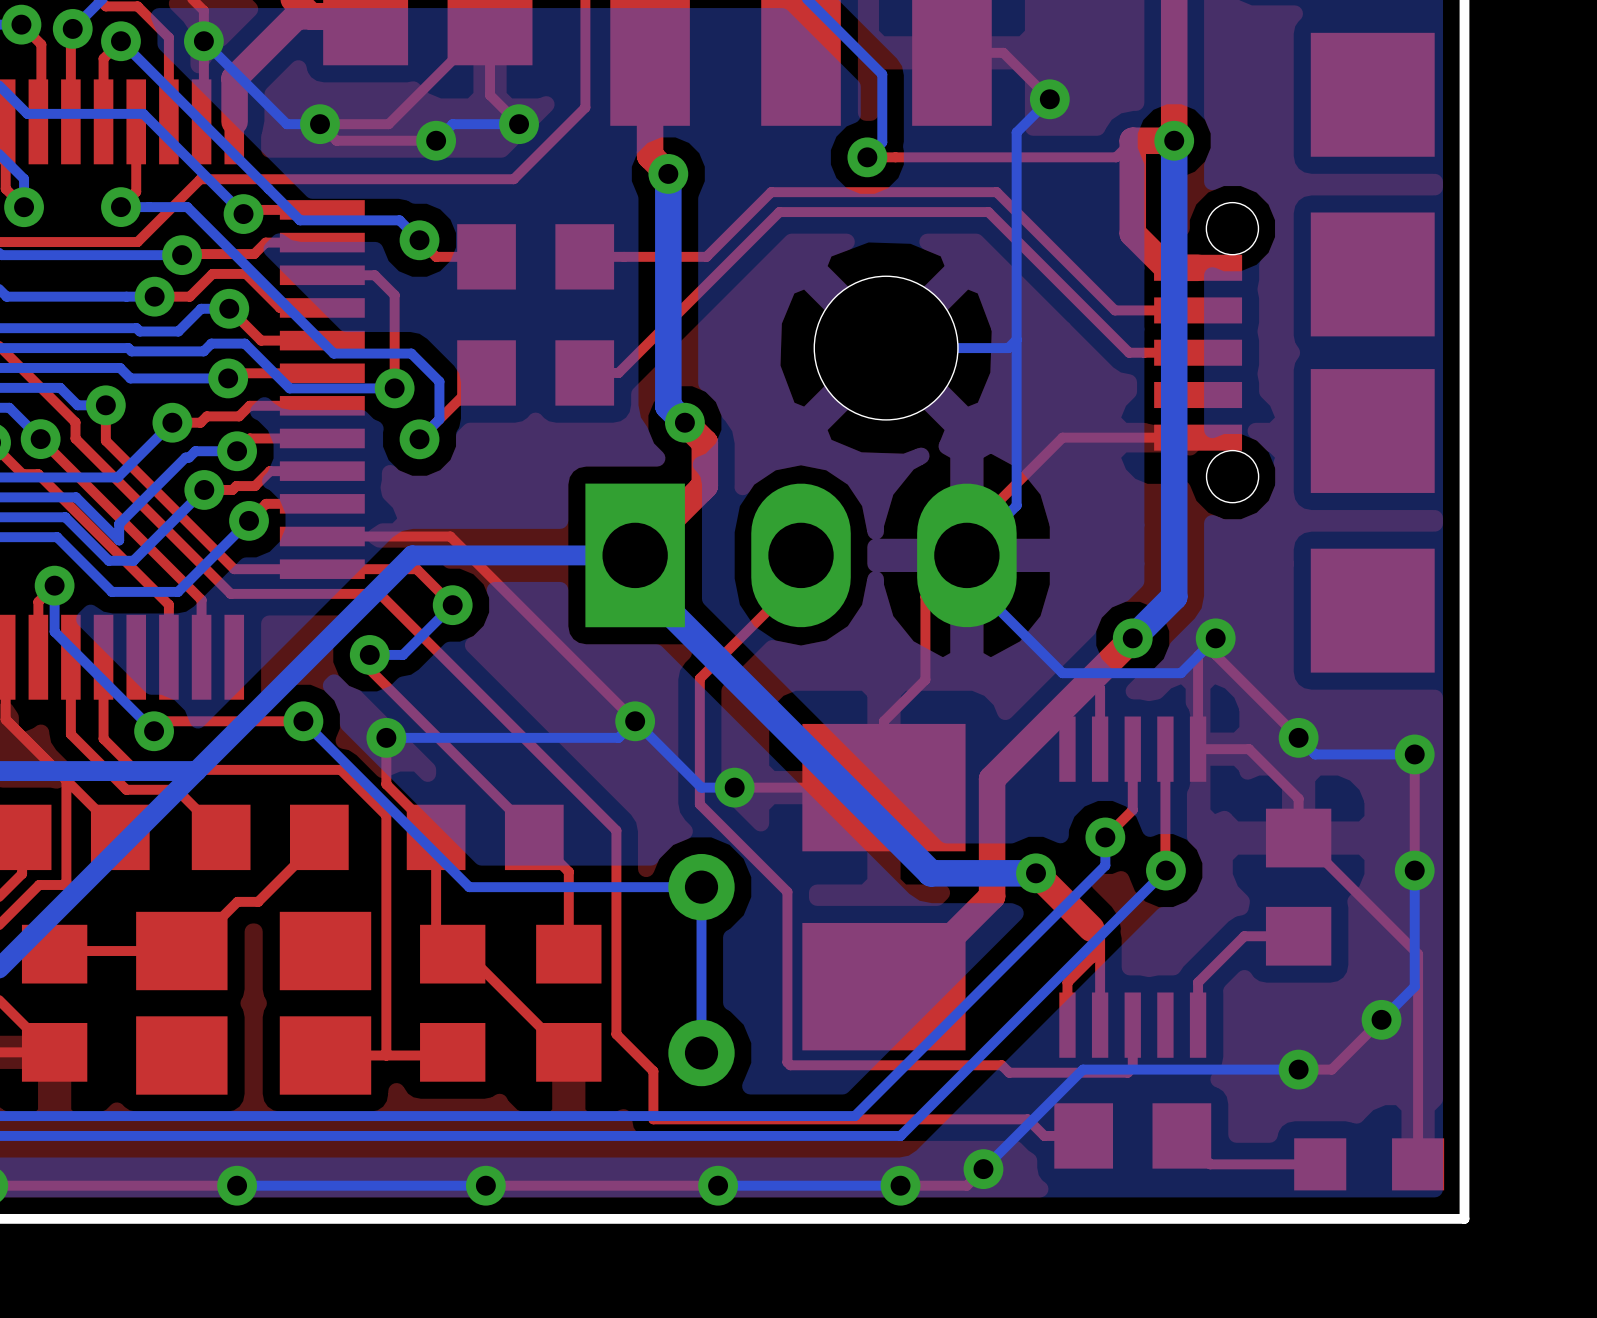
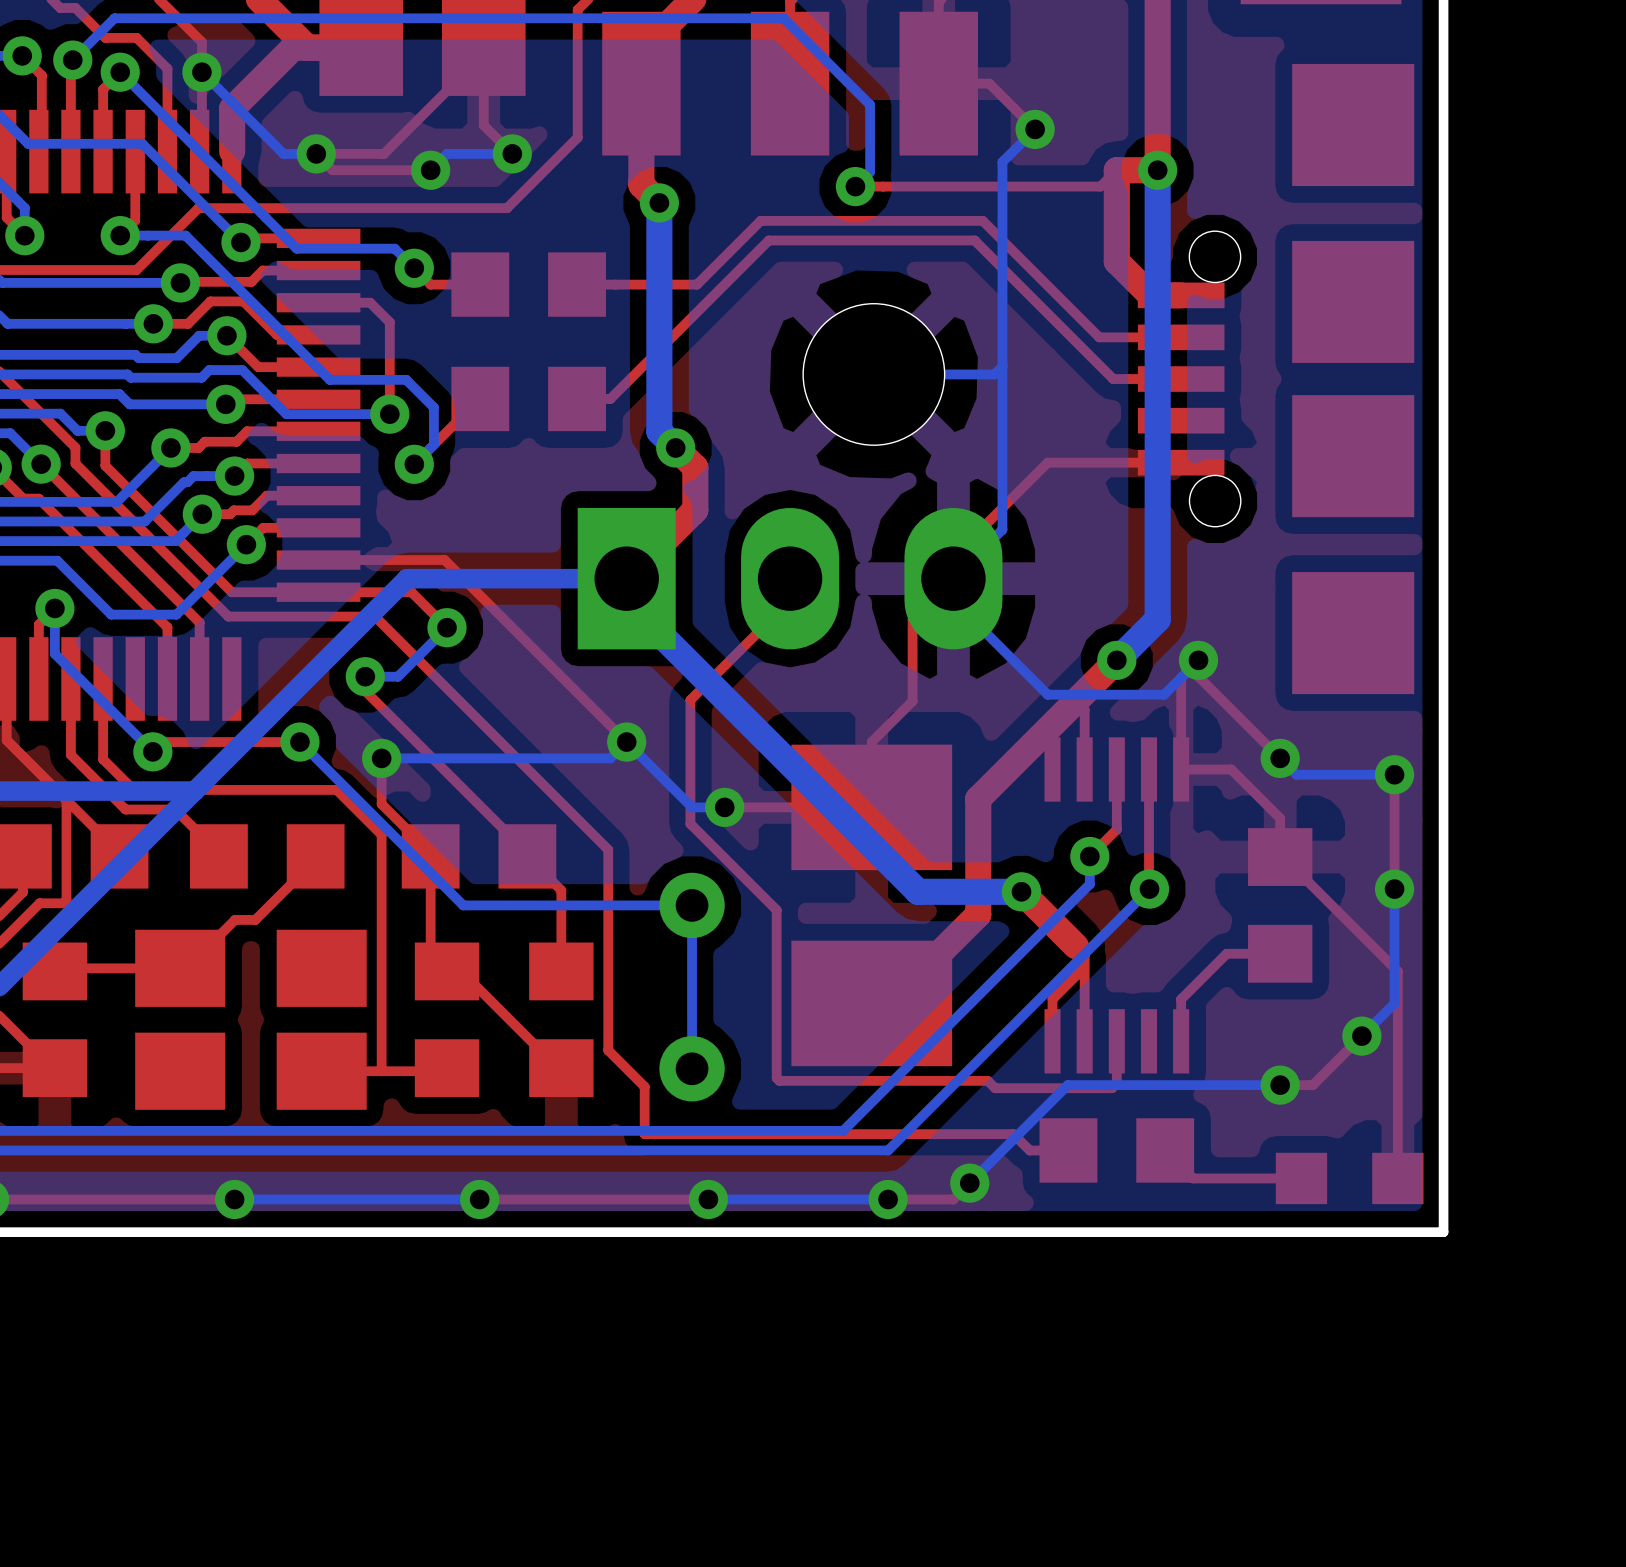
bottom track: (145, 497) (119, 524) (119, 540) (76, 497) -> (144, 521) (76, 521)
bottom track: (176, 517) (133, 560) (108, 560) (65, 517) -> (175, 541) (65, 541)

